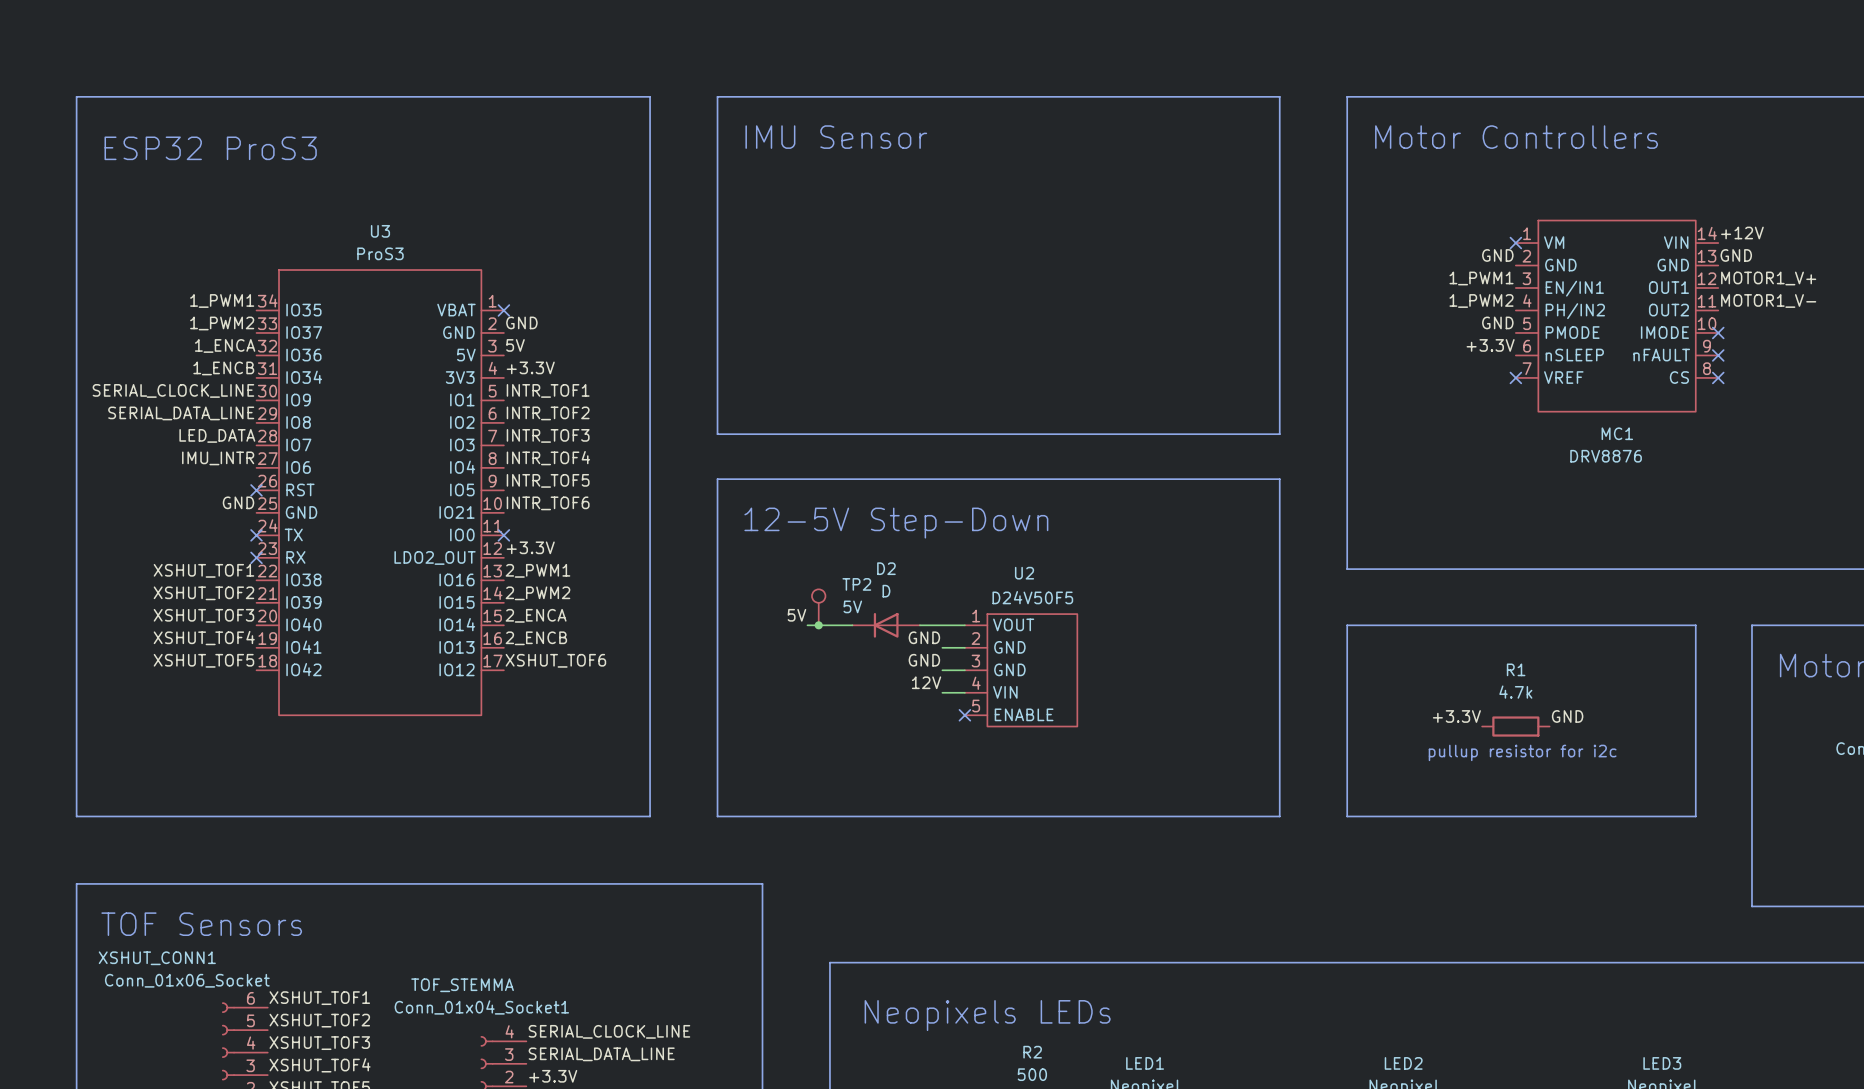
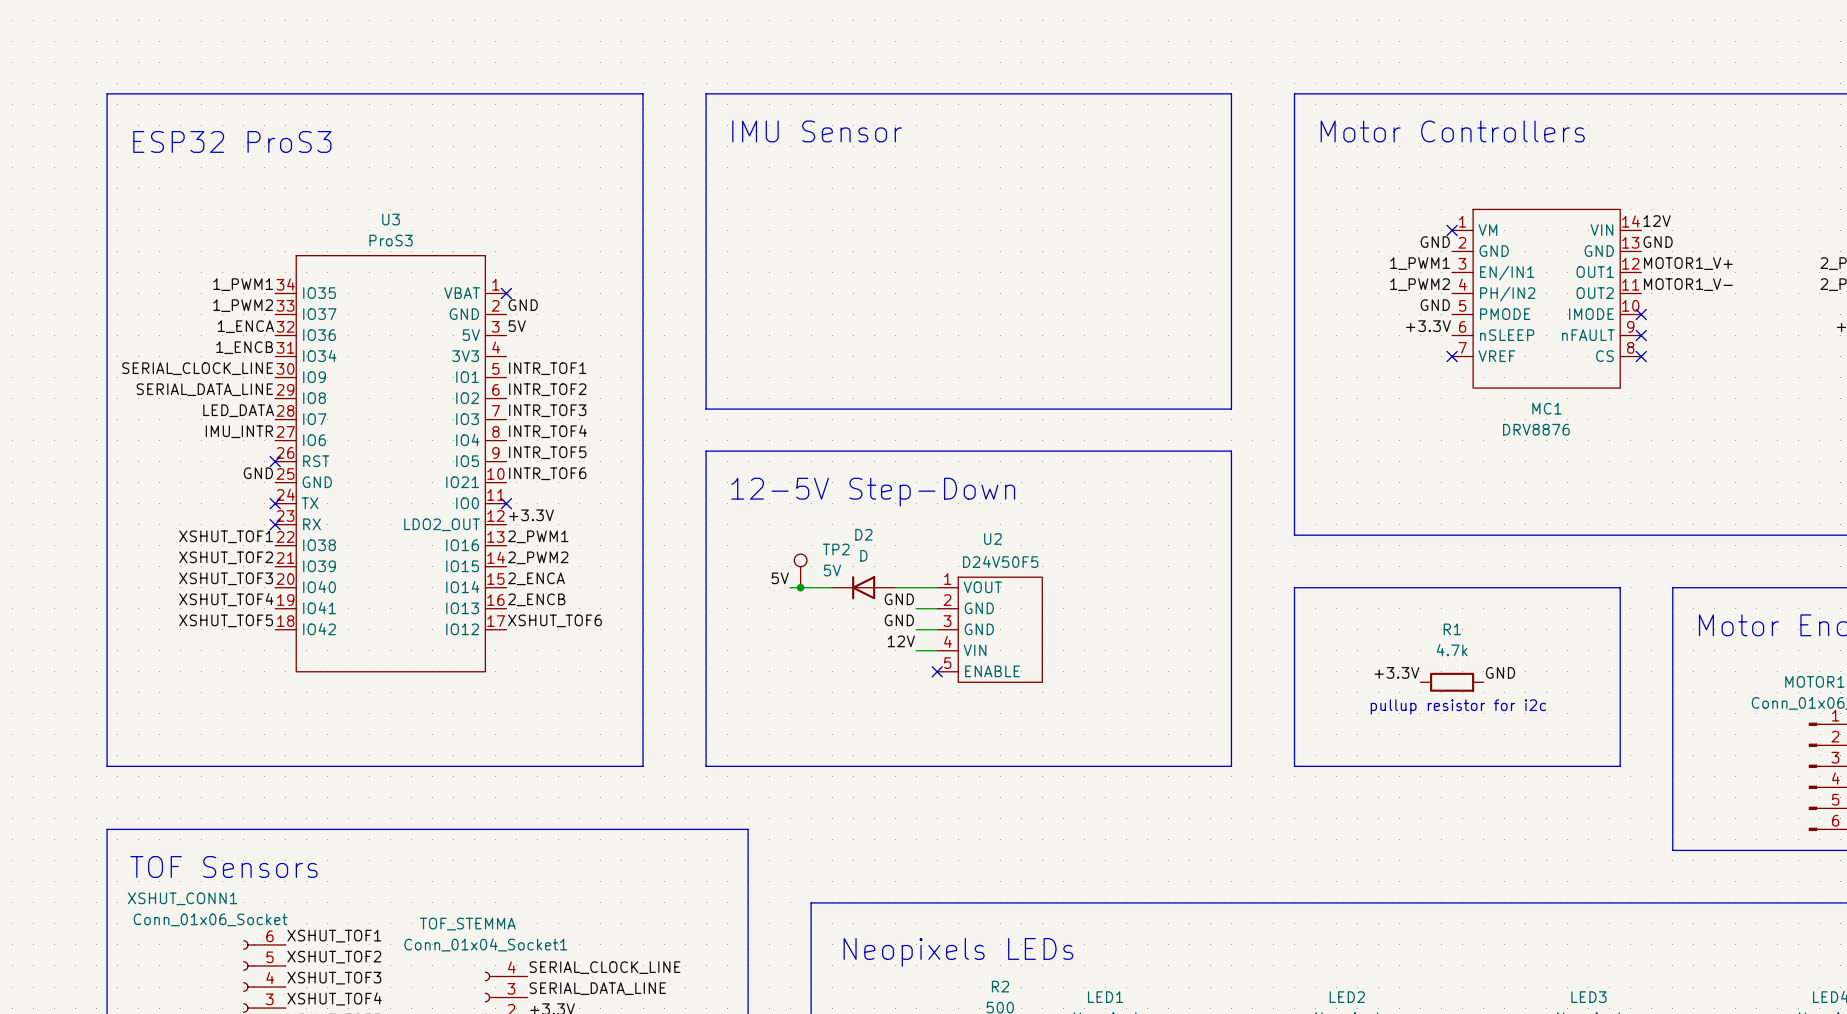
label: +12V (1742, 232) -> 12V (1657, 221)
label: +3.3V (530, 367) -> none

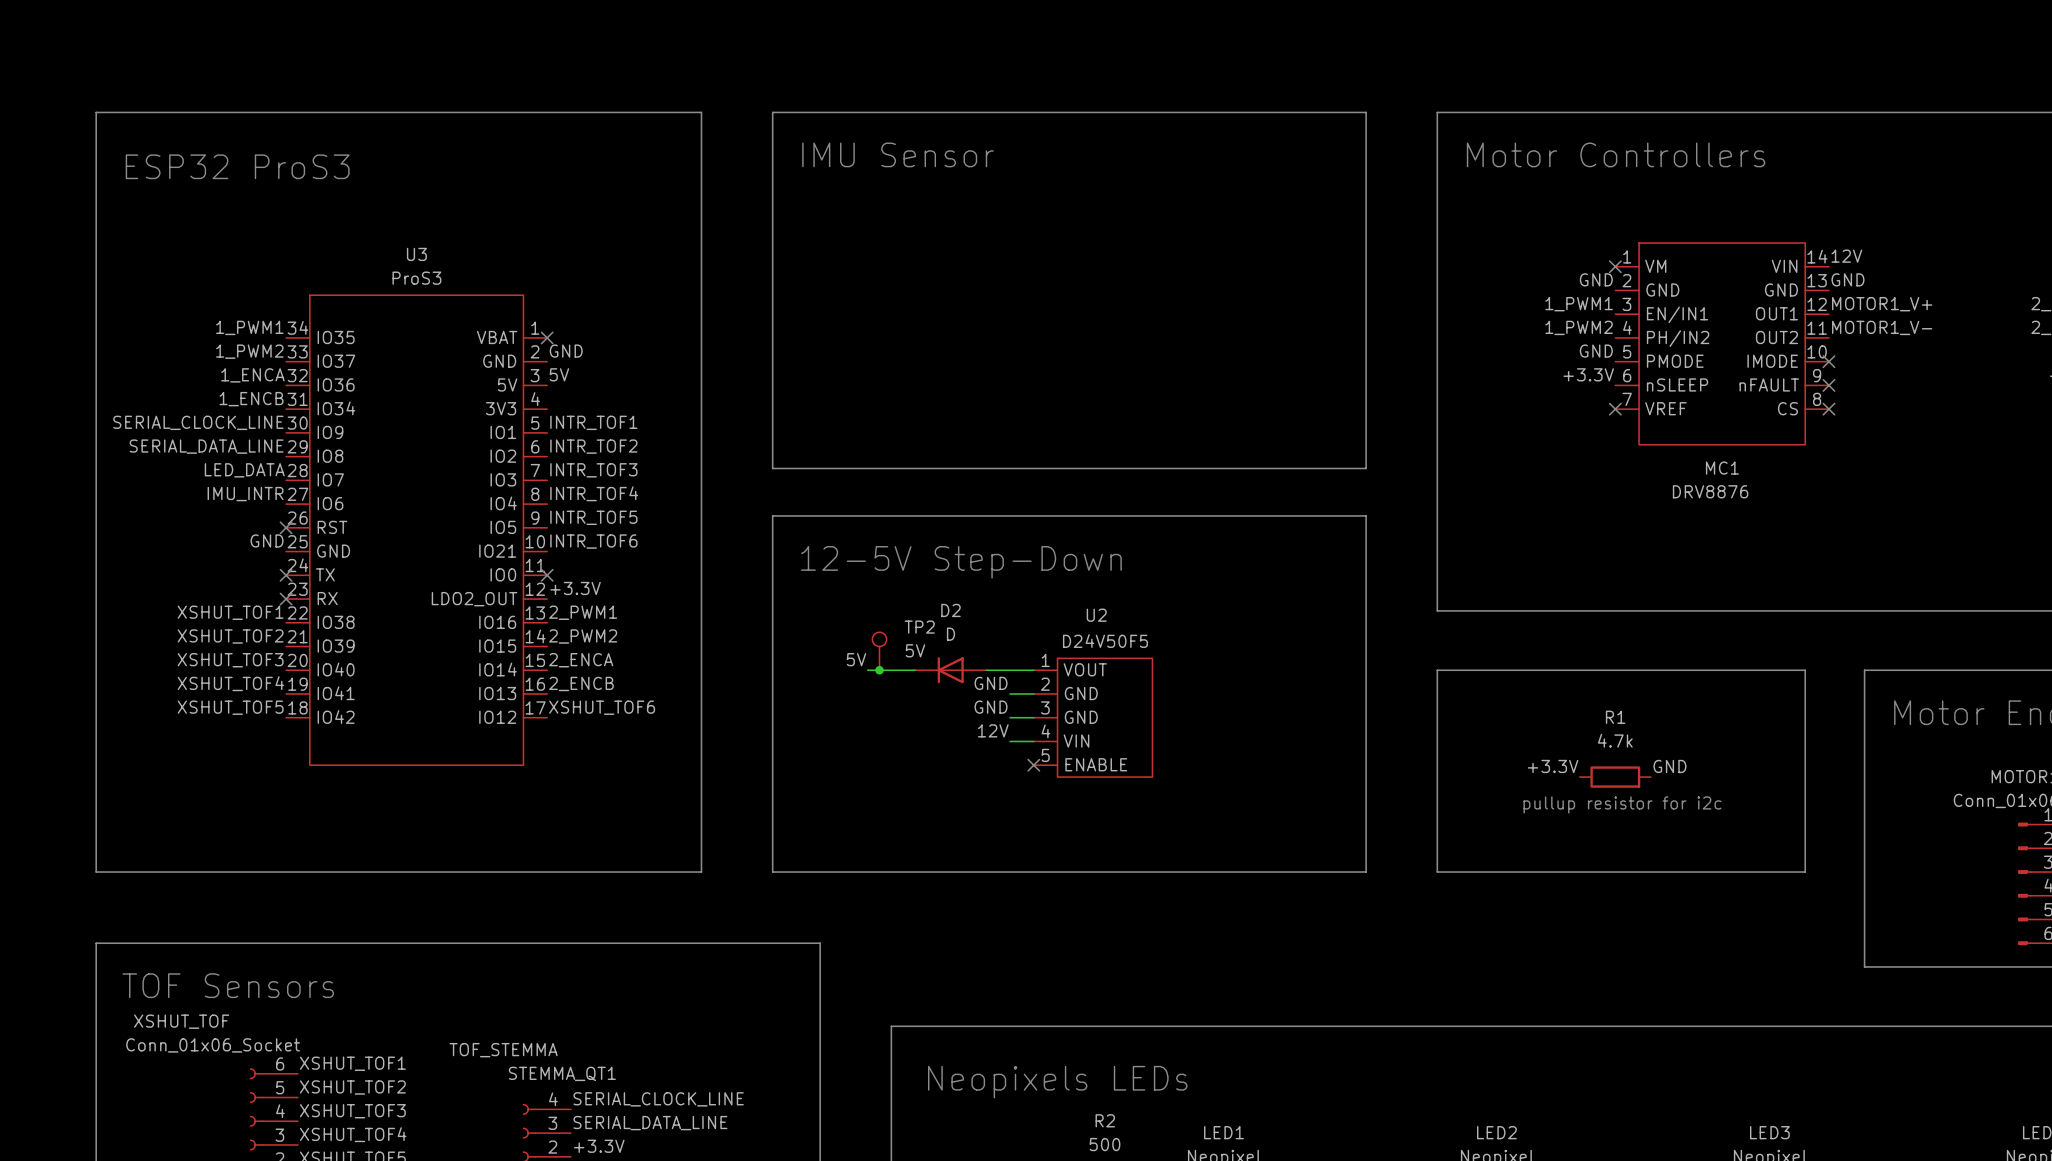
XSHUT_CONN1 name: XSHUT_CONN1 (182, 898) -> XSHUT_TOF (181, 1021)
Conn_01x04_Socket1 name: Conn_01x04_Socket1 (485, 944) -> STEMMA_QT1 (562, 1073)

